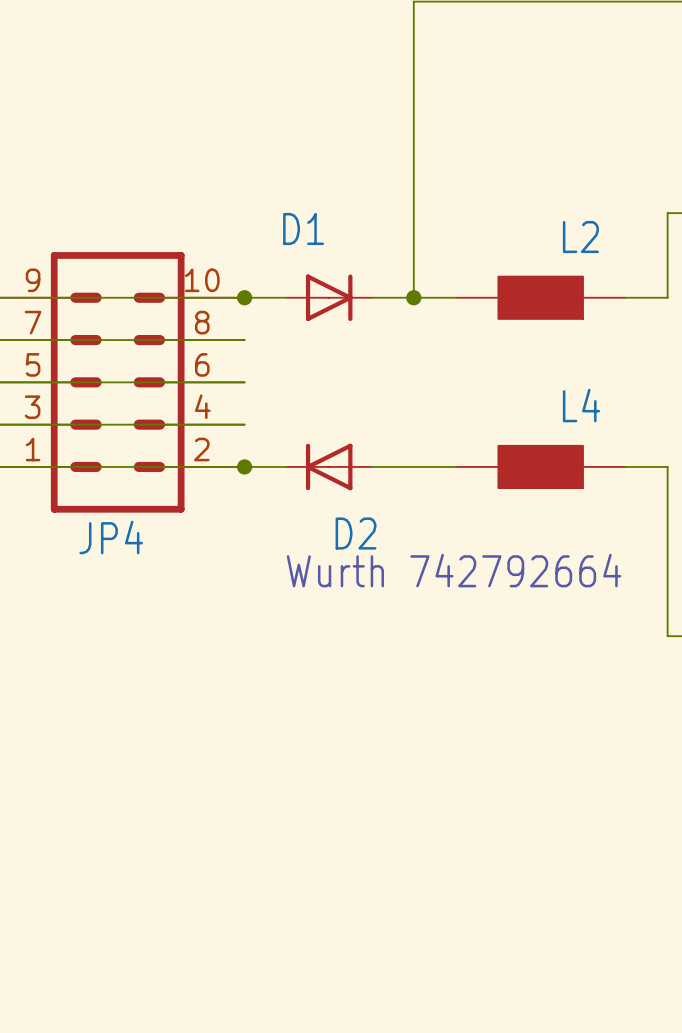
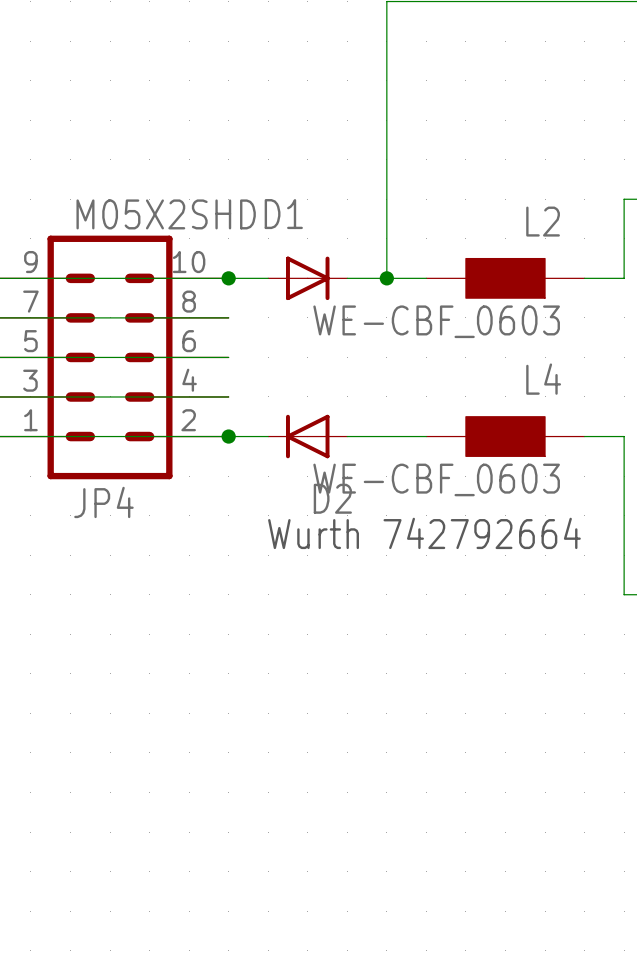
JP4 value: none -> M05X2SHD (166, 214)
L2 value: none -> WE-CBF_0603 (436, 321)
L4 value: none -> WE-CBF_0603 (436, 479)

